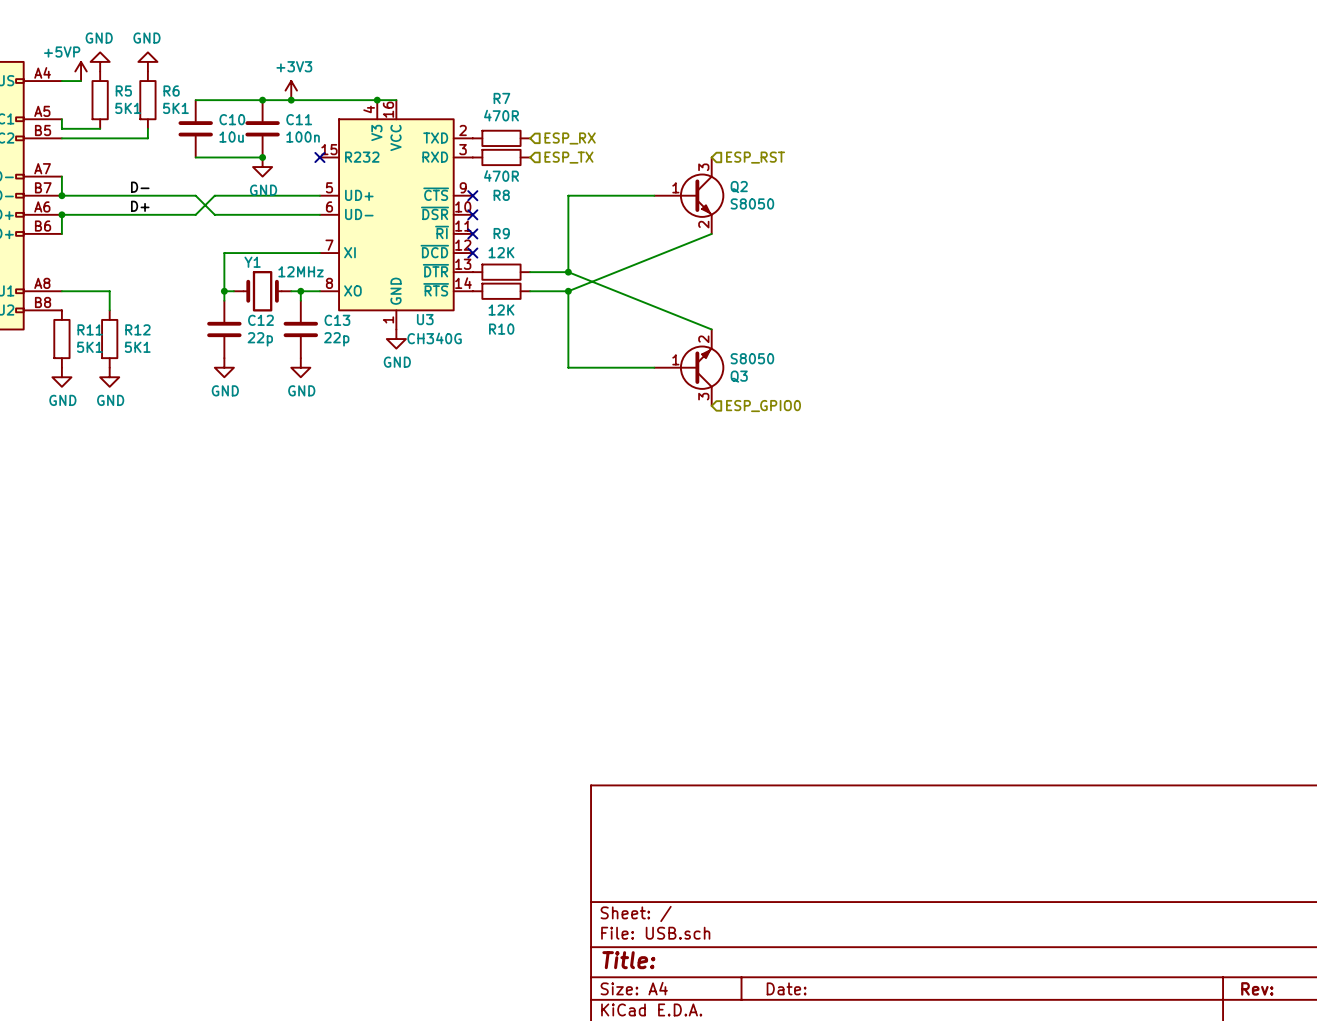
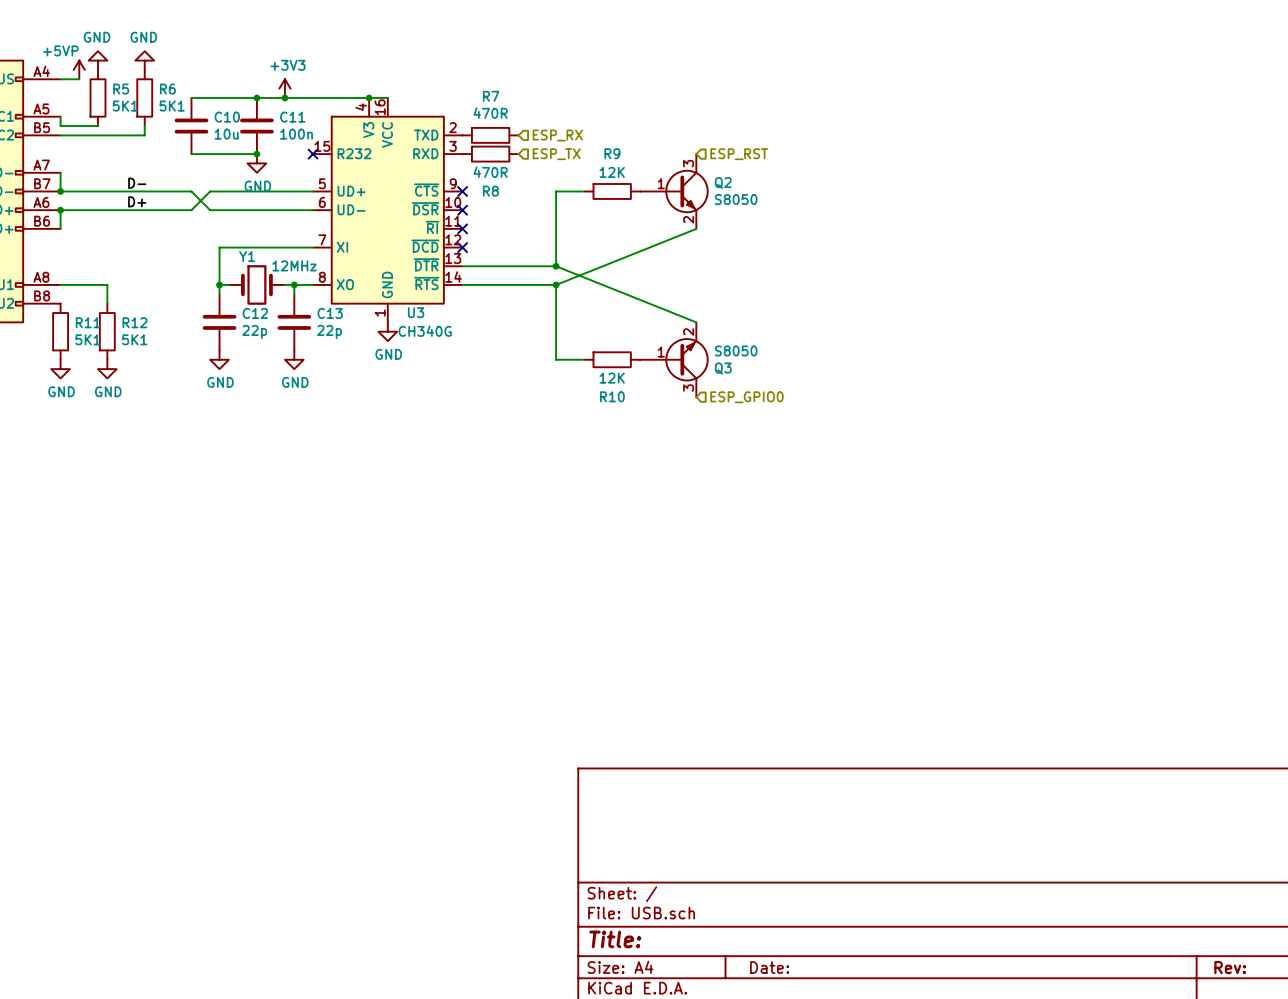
wire: (597, 195) (654, 195) -> (462, 266) (518, 266)
R9 position: (501, 272) -> (612, 191)
R10 position: (501, 291) -> (612, 359)
wire: (597, 367) (654, 367) -> (462, 284) (518, 284)

